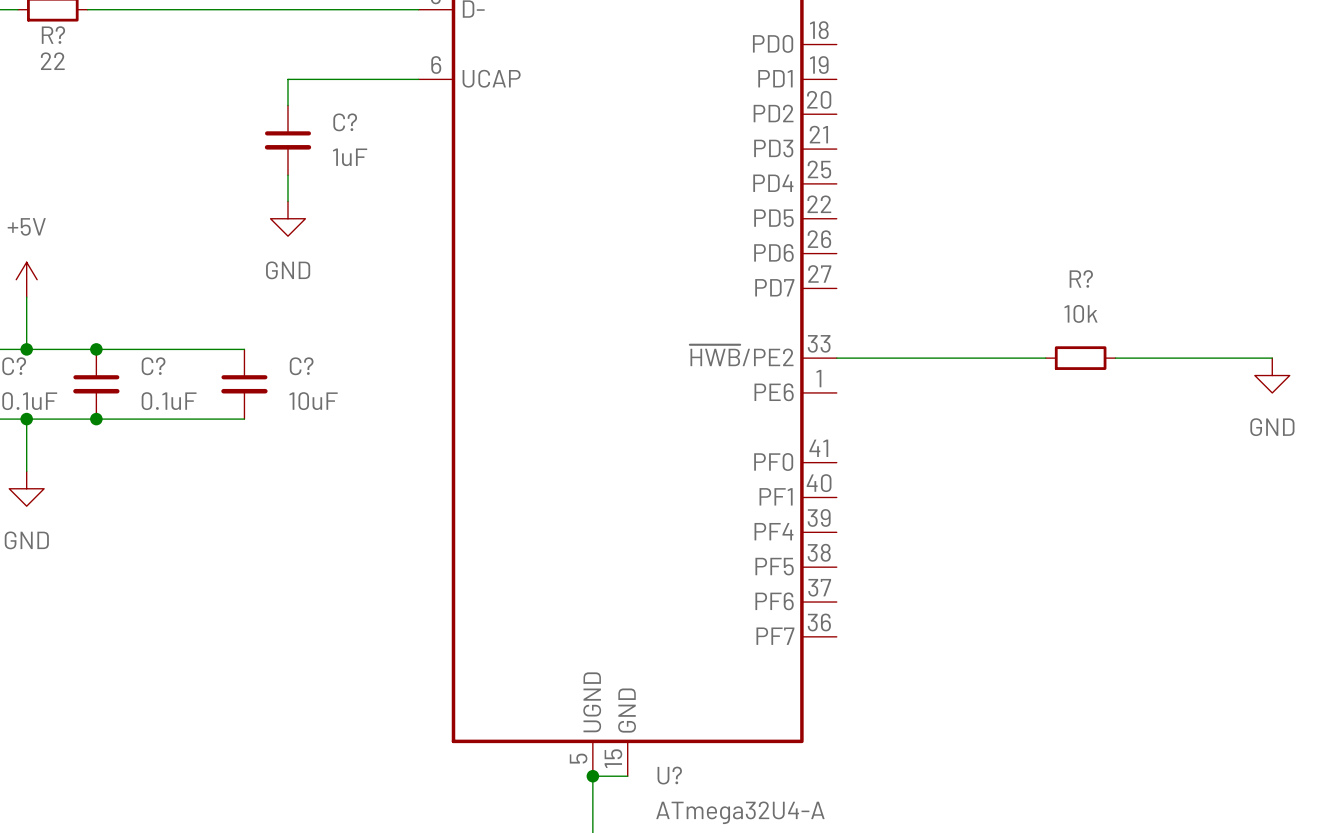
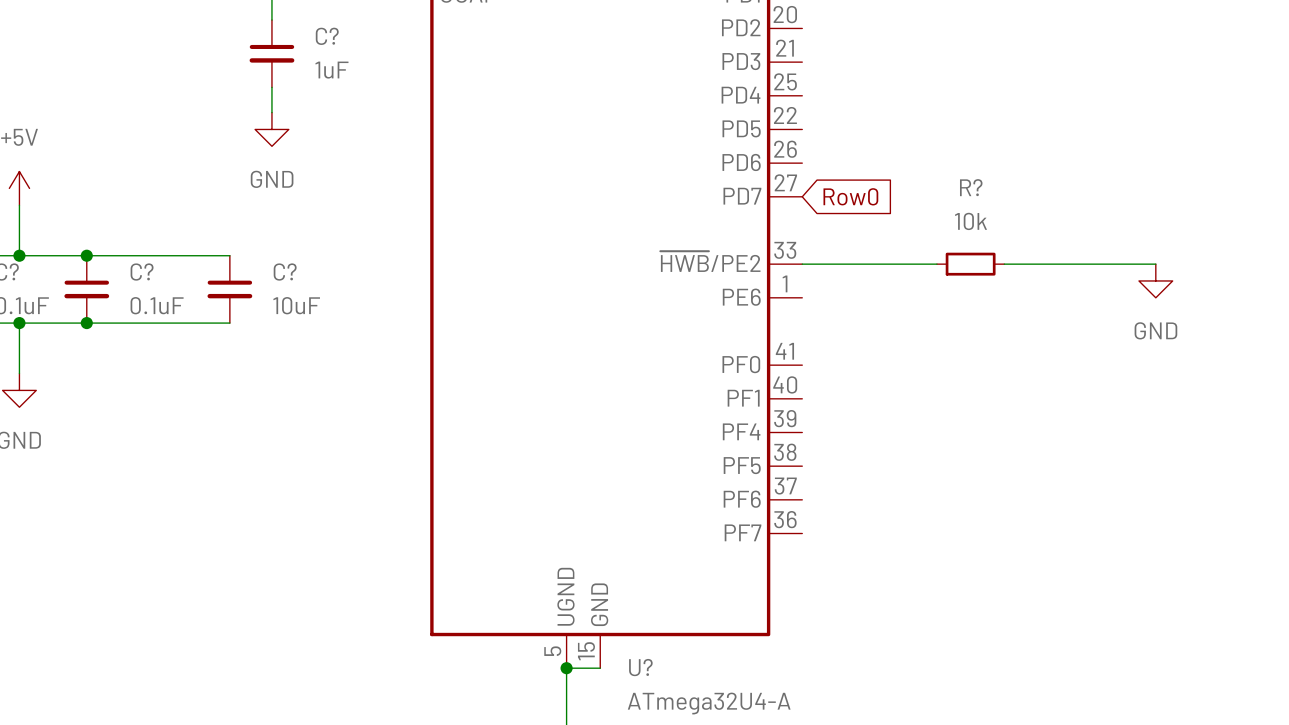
global label: none -> Row0 (850, 196)
wire: (976, 358) (1045, 358) -> (1071, 264) (1004, 264)
R? position: (1080, 358) -> (970, 264)
wire: (1202, 358) (1272, 358) -> none
power symbol position: GND (1272, 375) -> GND (1155, 280)

